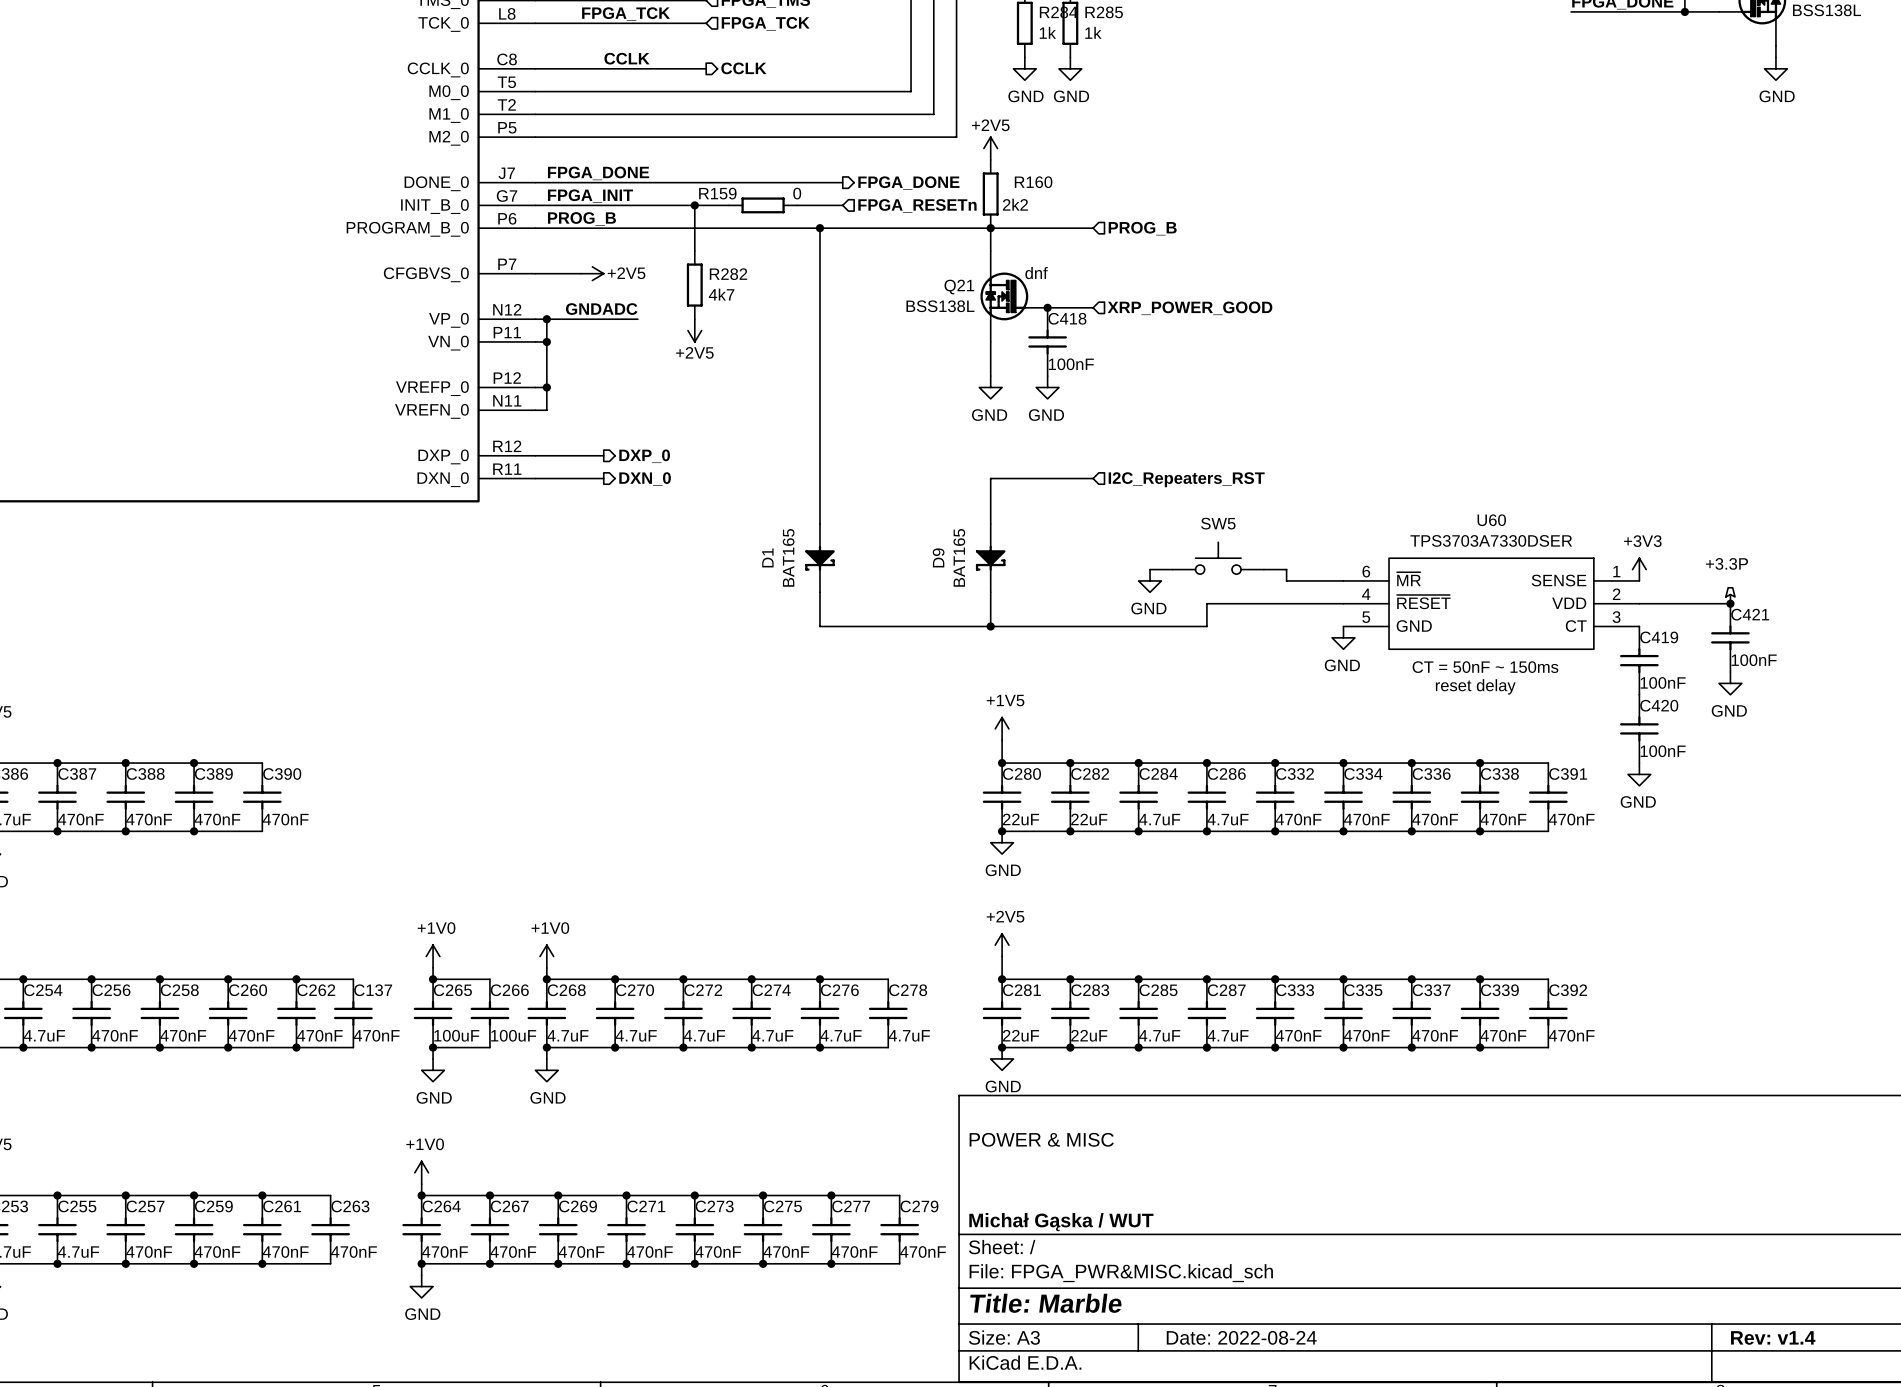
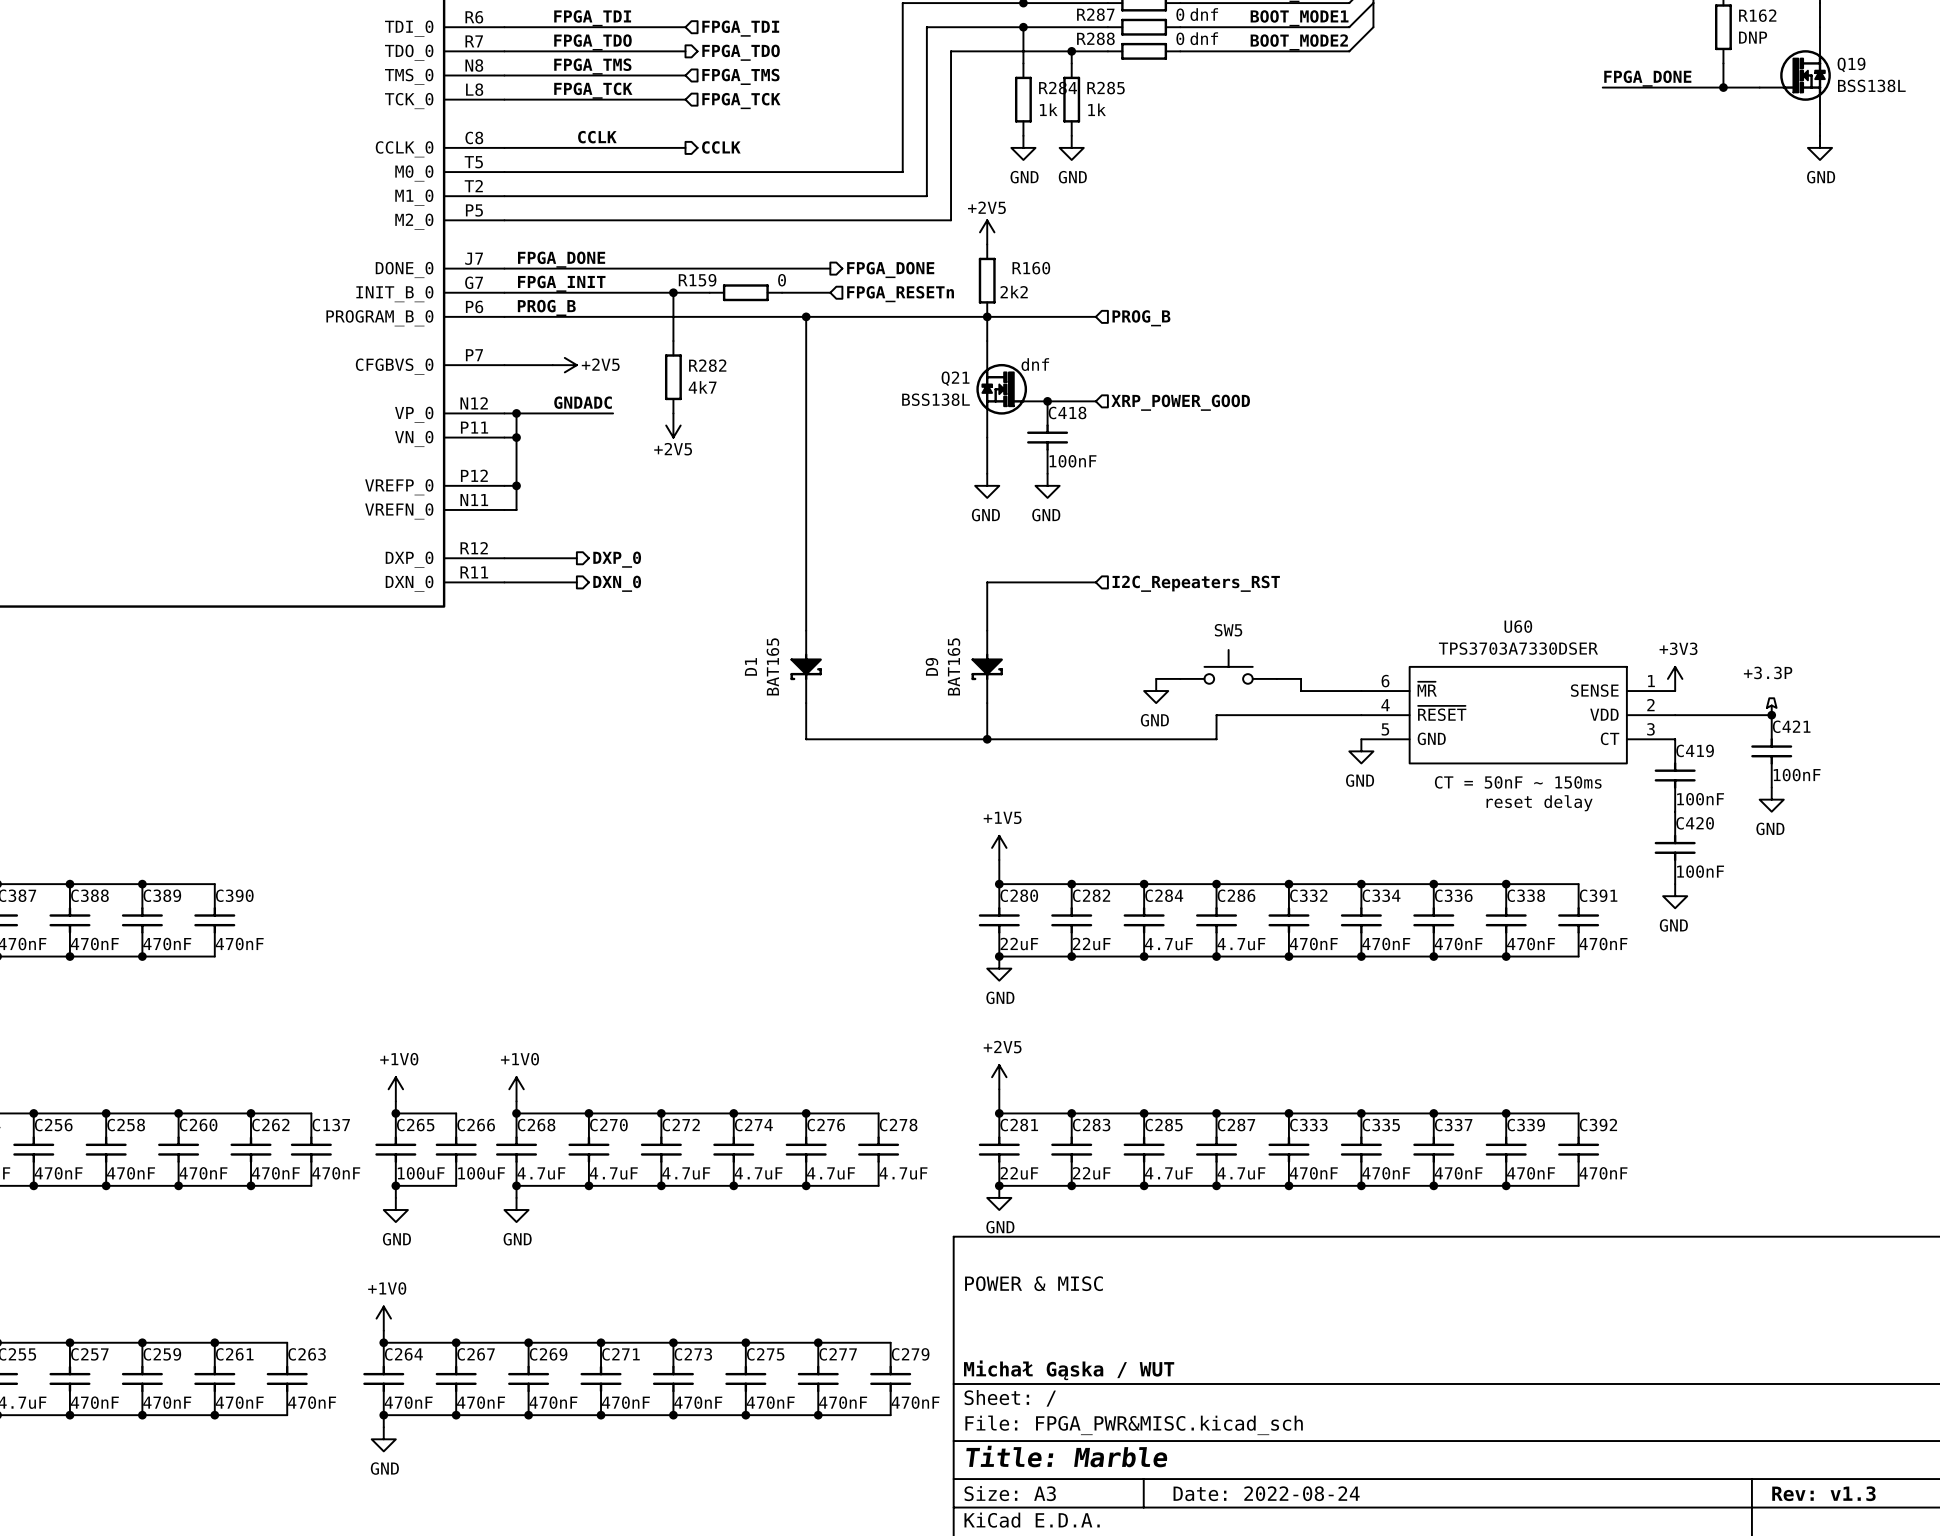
title block: Rev: v1.4 (1773, 1337) -> Rev: v1.3 (1823, 1493)

